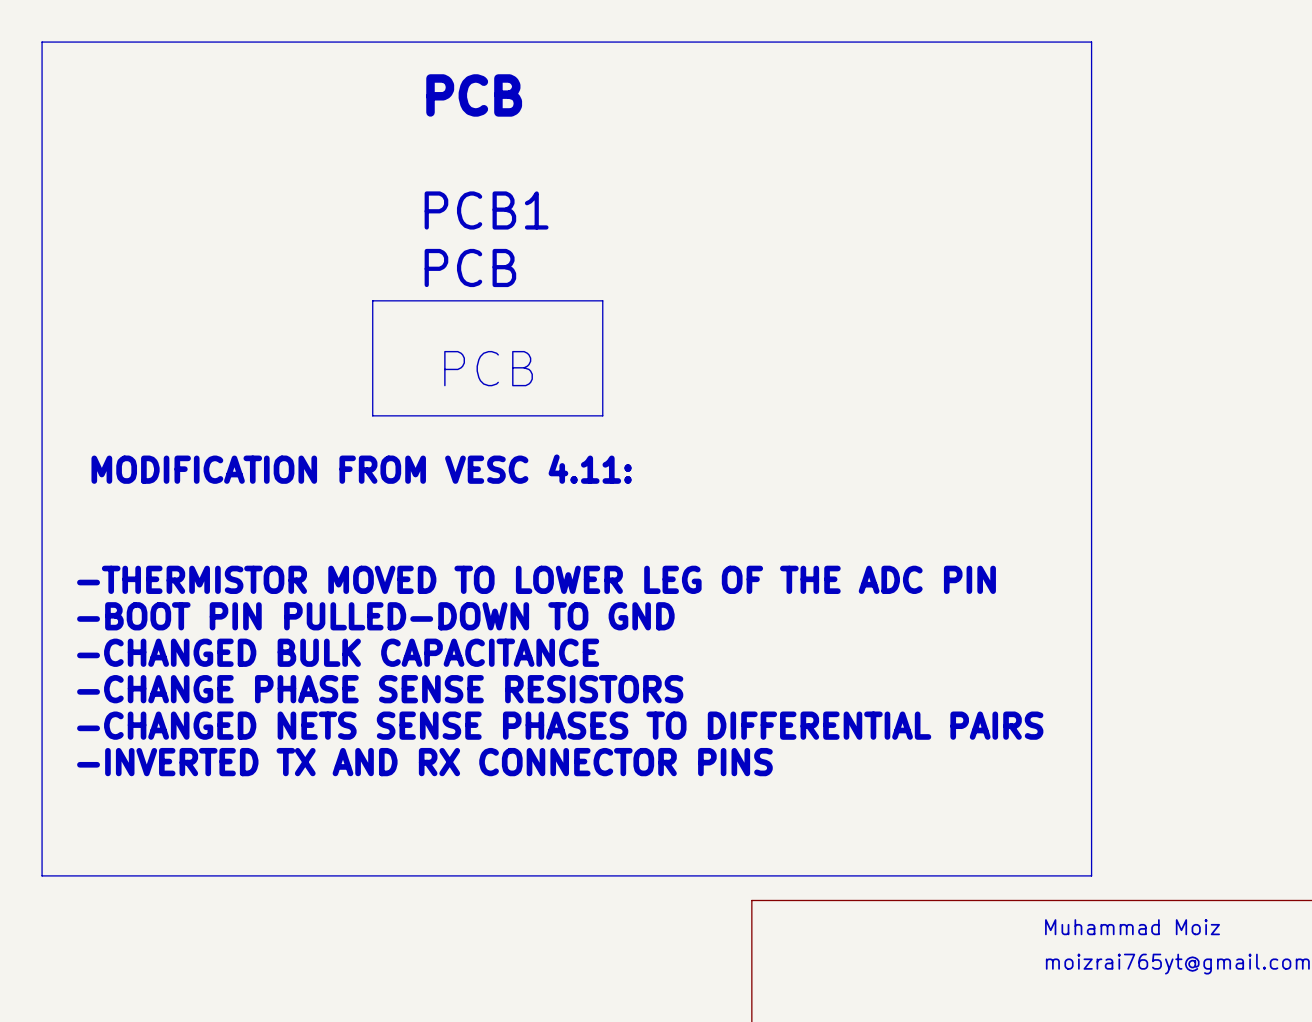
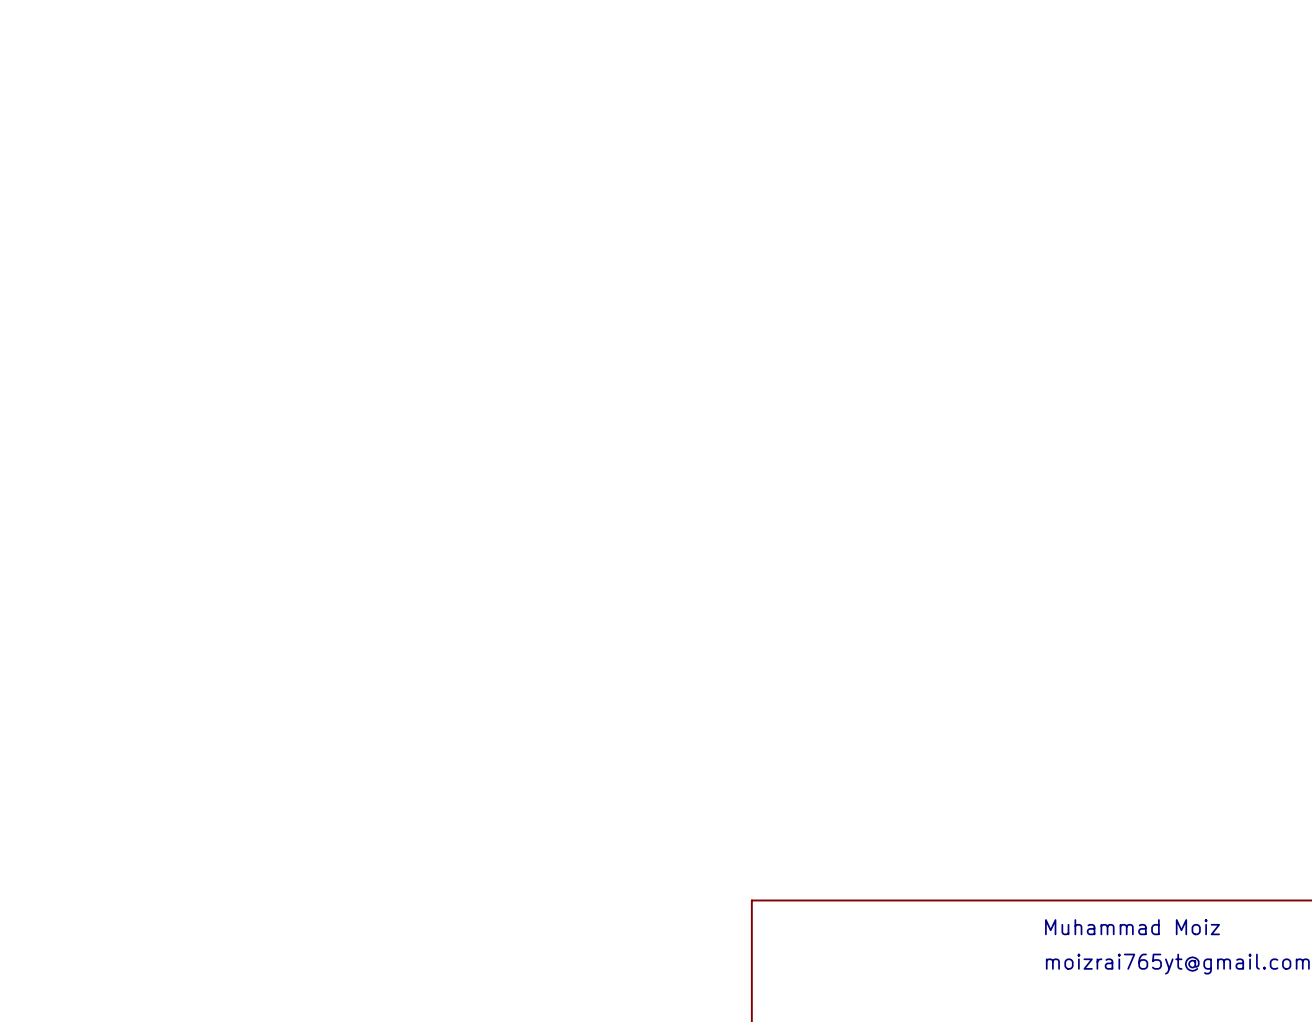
line: (42, 42) (1091, 42) (1091, 875) (42, 875) (42, 42) -> none
text: PCB (474, 95) -> none
text: PCB1 (486, 210) -> none
text: PCB (470, 267) -> none
line: (372, 300) (602, 300) (602, 415) (372, 415) (372, 300) -> none
text: PCB (488, 368) -> none
text: MODIFICATION FROM VESC 4.11: (361, 469) -> none
text: -THERMISTOR MOVED TO LOWER LEG OF THE ADC PIN (536, 579) -> none
text: -BOOT PIN PULLED-DOWN TO GND (375, 616) -> none
text: -CHANGED BULK CAPACITANCE (338, 652) -> none
text: -CHANGE PHASE SENSE RESISTORS (380, 689) -> none
text: -CHANGED NETS SENSE PHASES TO DIFFERENTIAL PAIRS (560, 725) -> none
text: -INVERTED TX AND RX CONNECTOR PINS (424, 762) -> none

